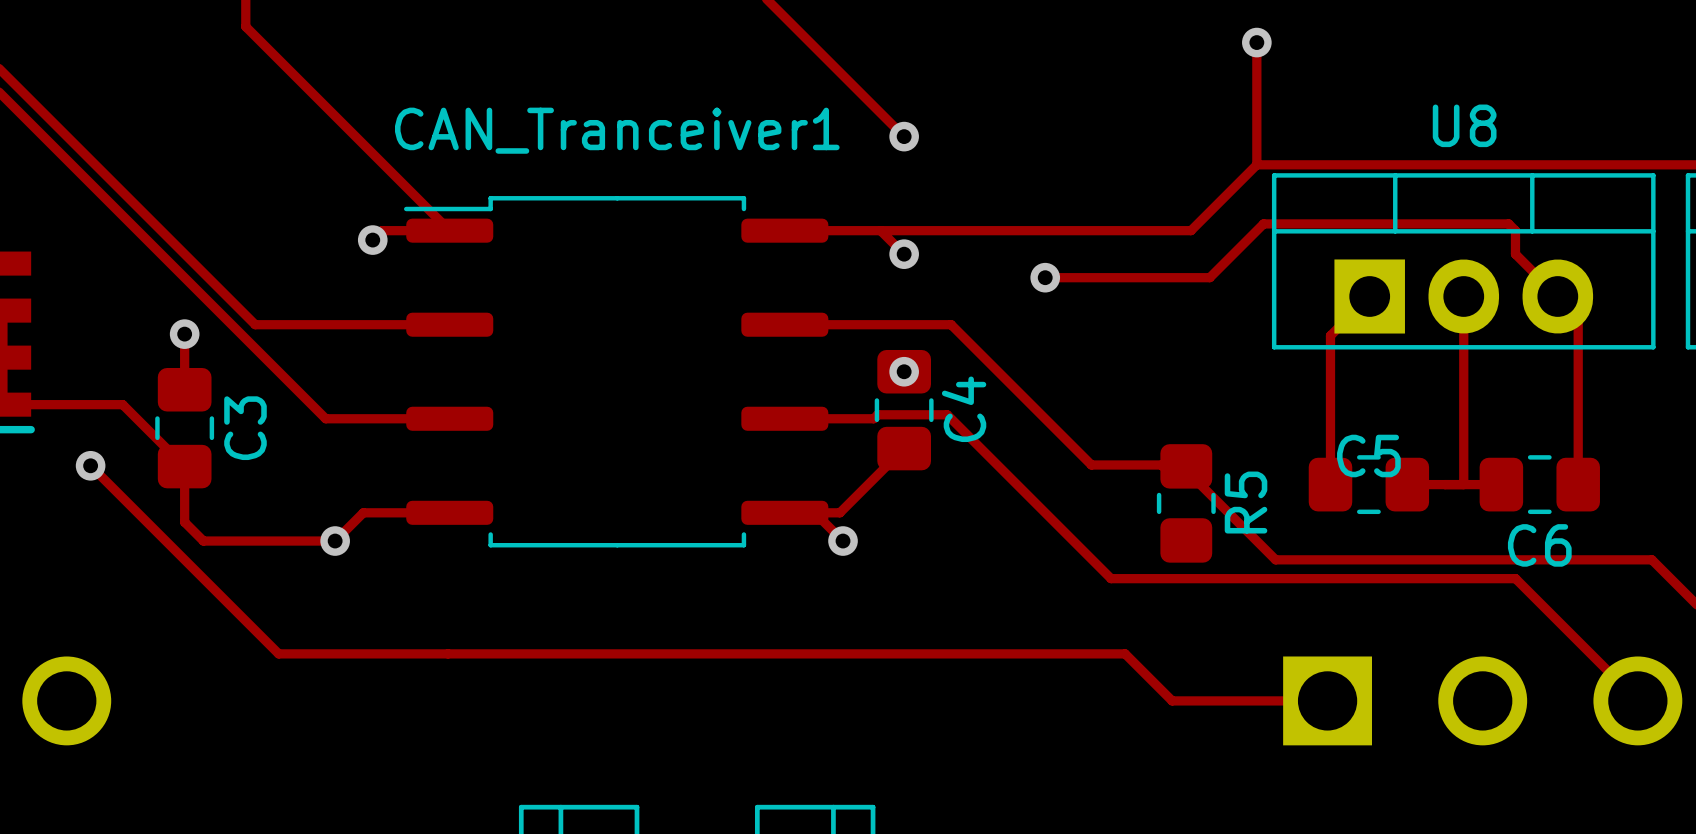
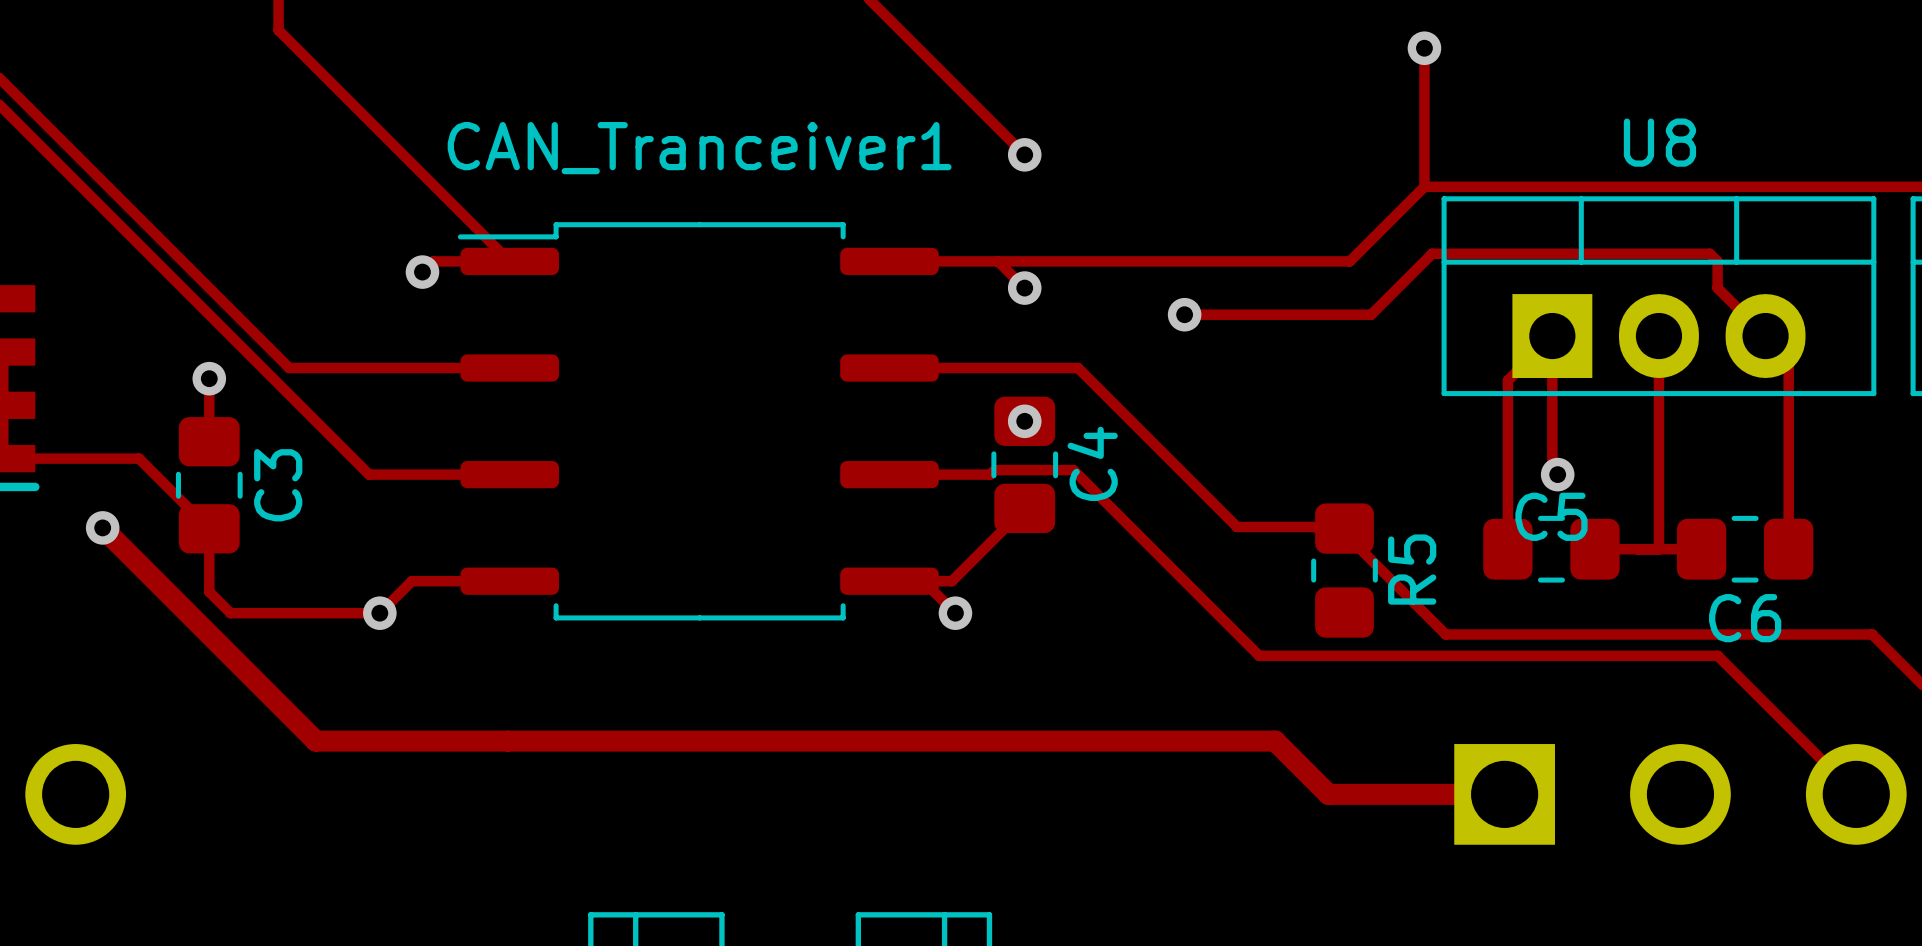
track: none -> (1552, 336) (1552, 469) (1557, 474)
via: none -> (1557, 474)
track width: thin (90, 465) (278, 653) (1125, 653) (1172, 700) (1327, 700) -> thick (102, 527) (315, 741) (1275, 741) (1328, 794) (1504, 794)

